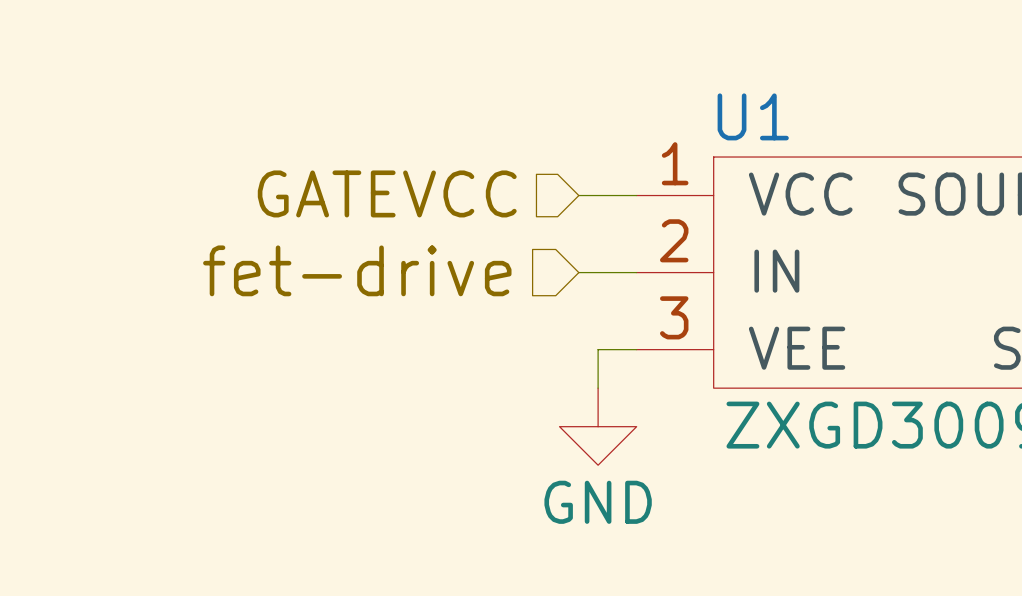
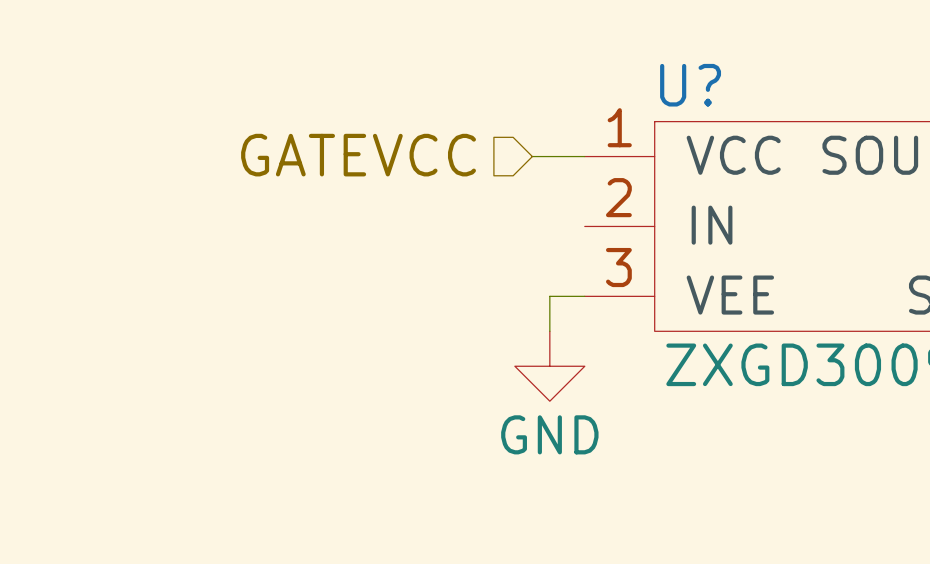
U1 name: U1 (753, 116) -> U? (690, 85)
hierarchical label: fet-drive (357, 270) -> none
wire: (578, 272) (636, 272) -> none

